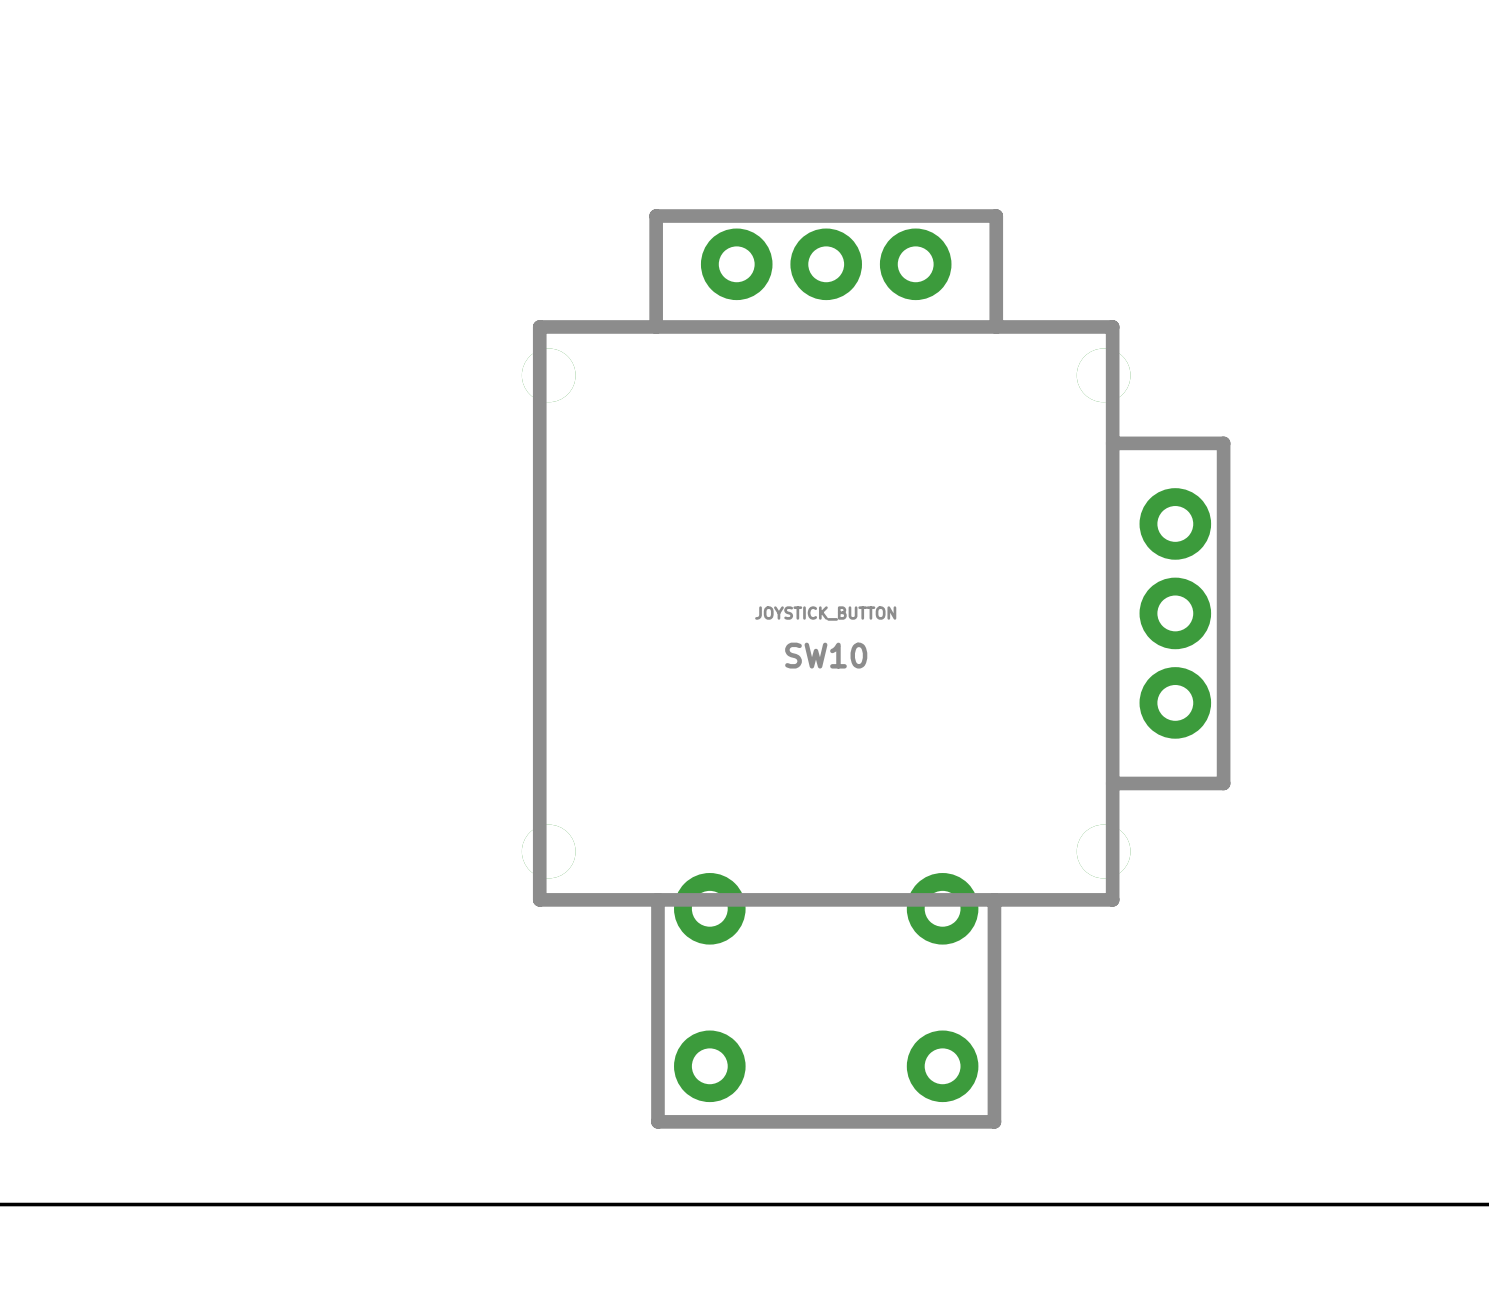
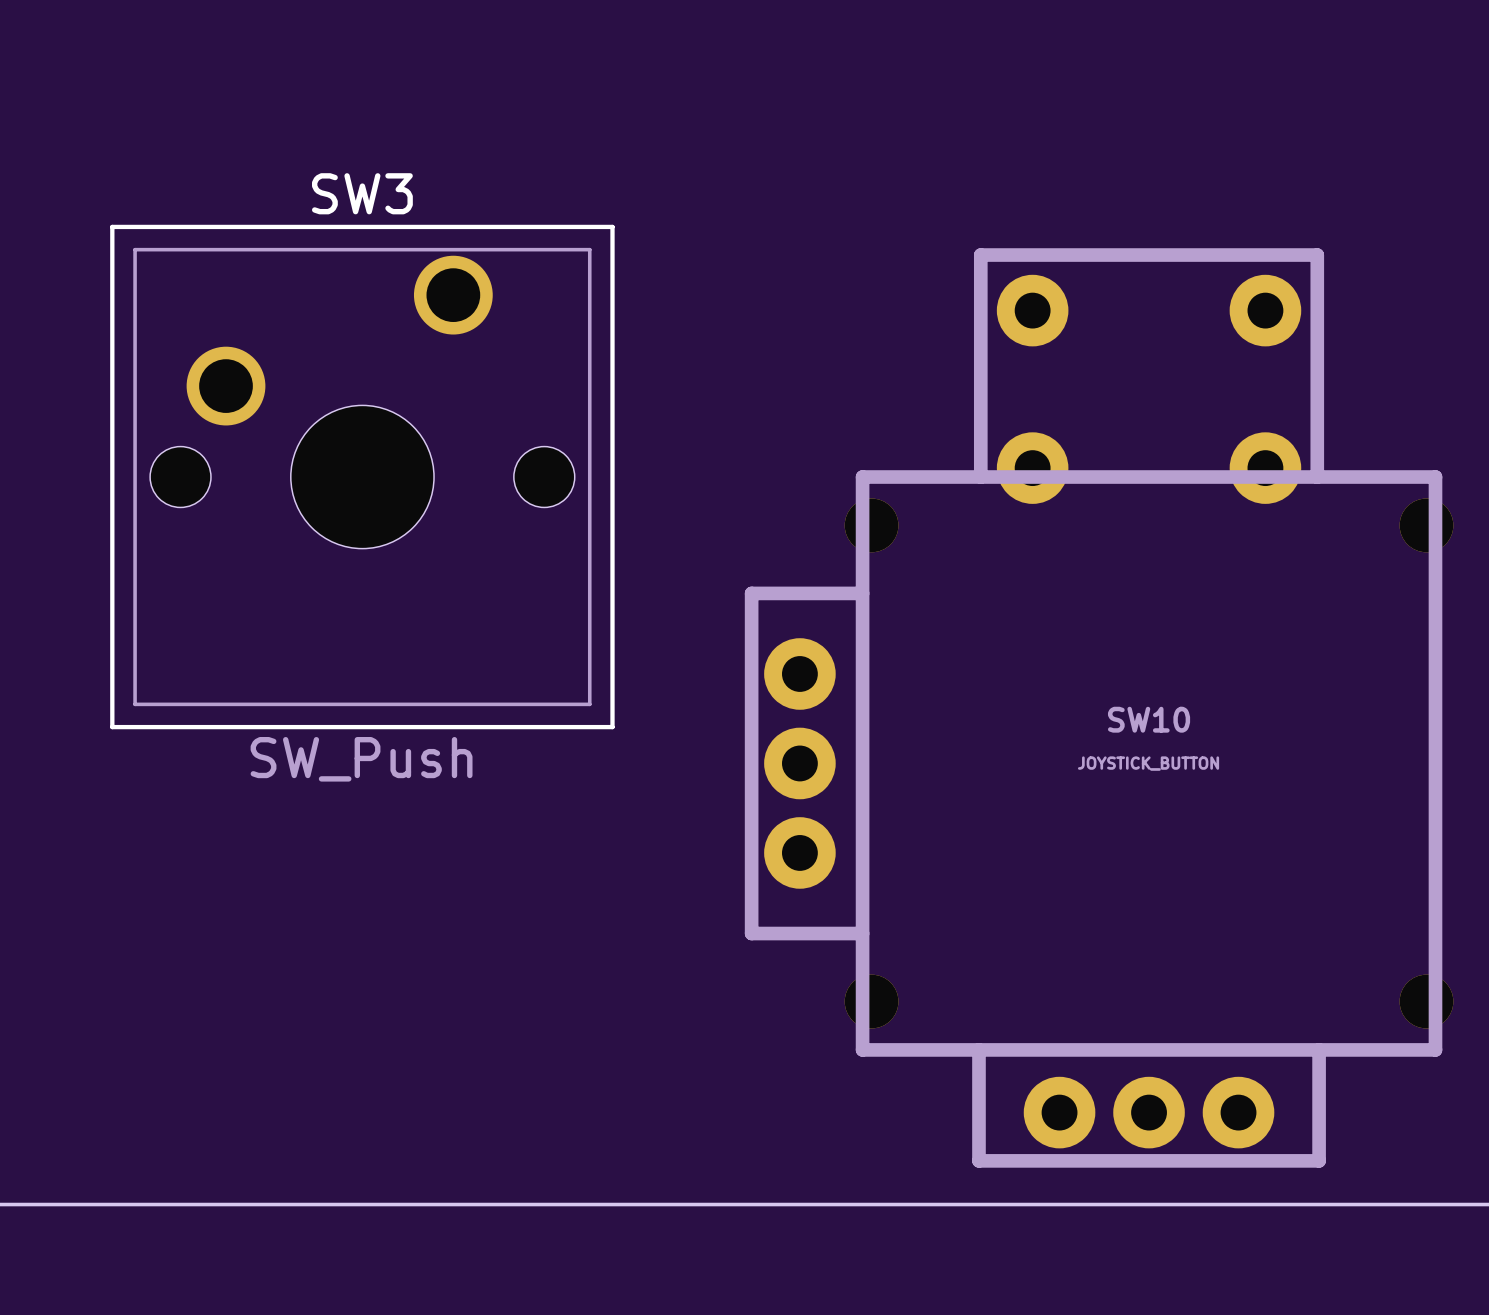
SW3: none -> SW_Push (362, 477)
SW10 rotation: 0° (876, 668) -> 180° (1099, 707)

